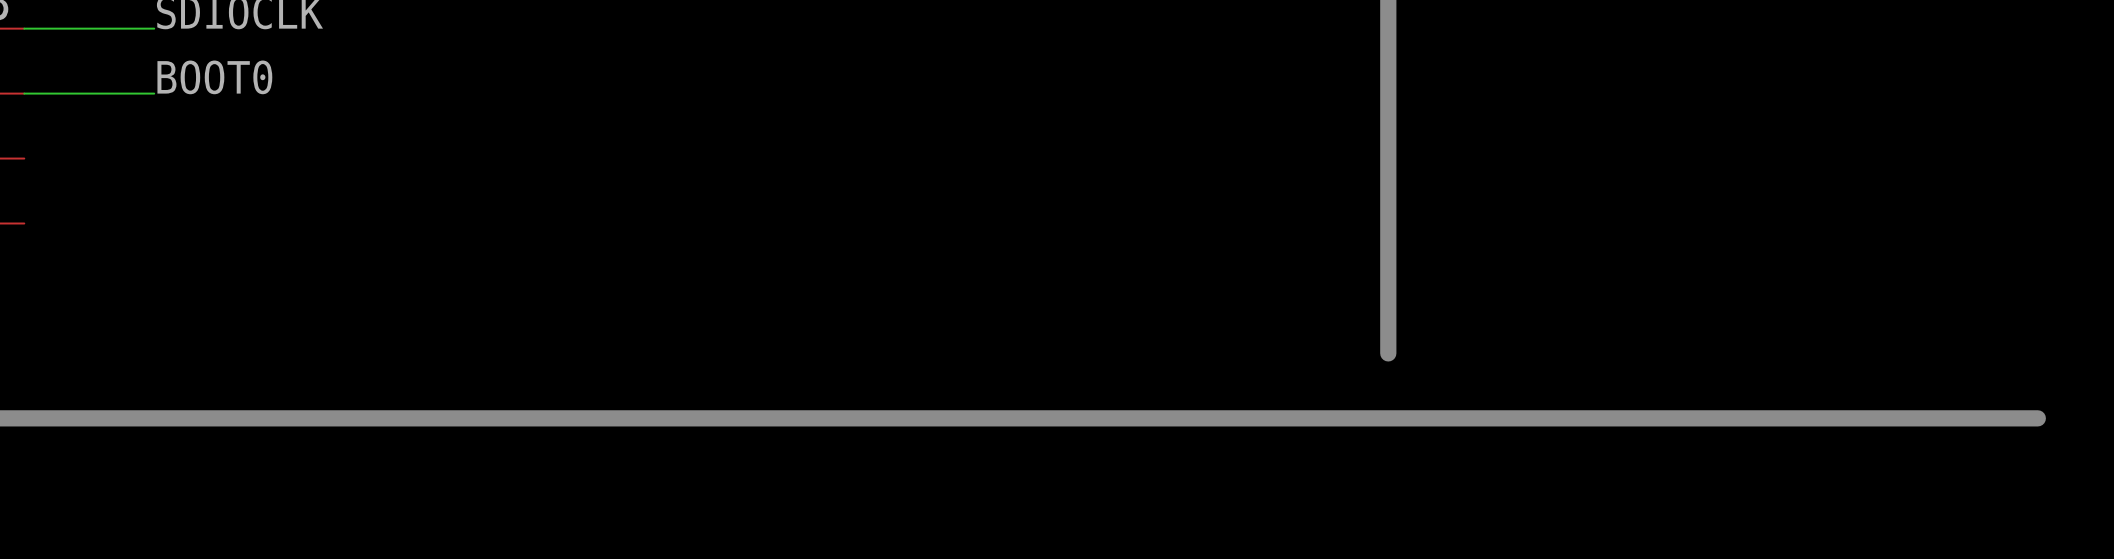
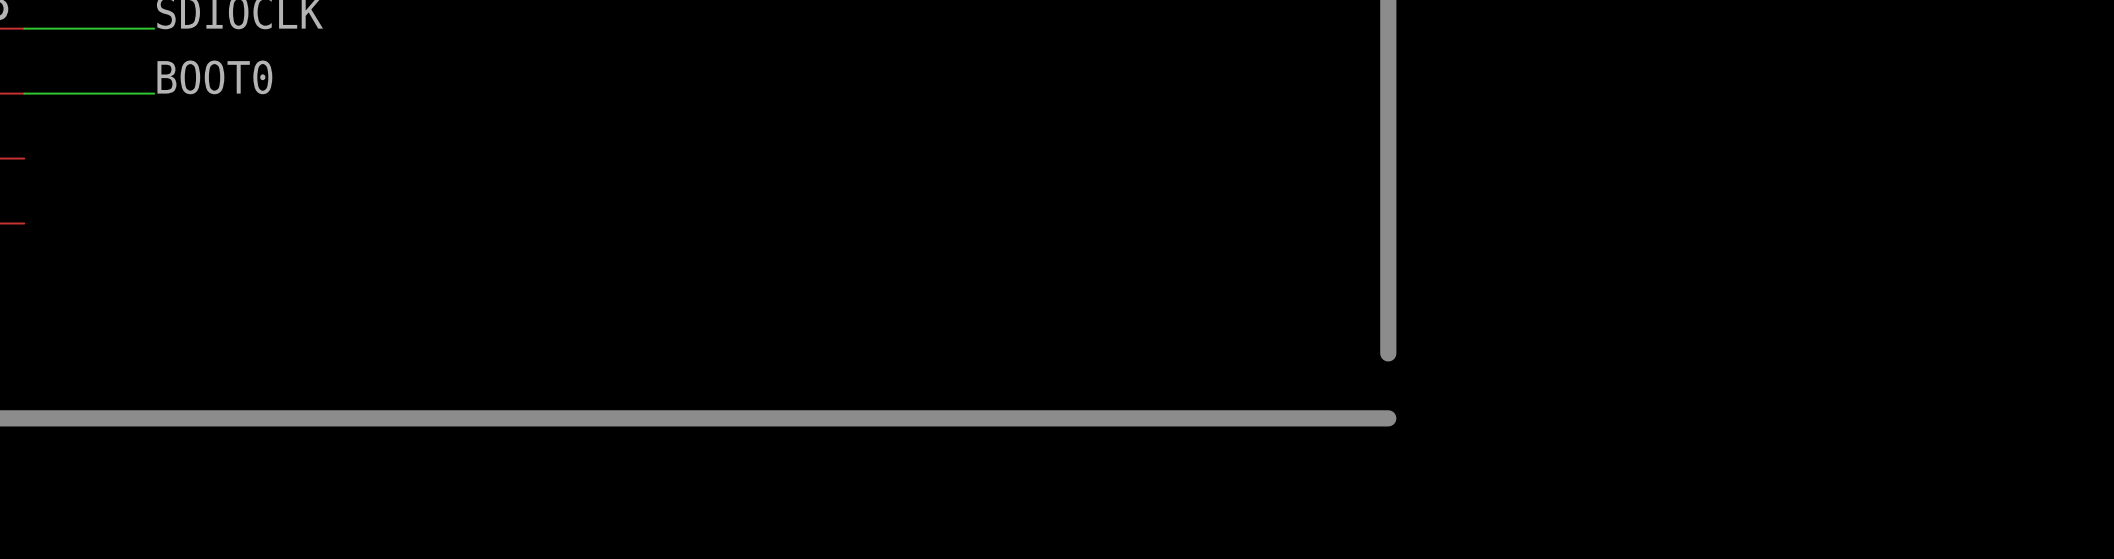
line: (1388, 418) (2037, 418) -> none

